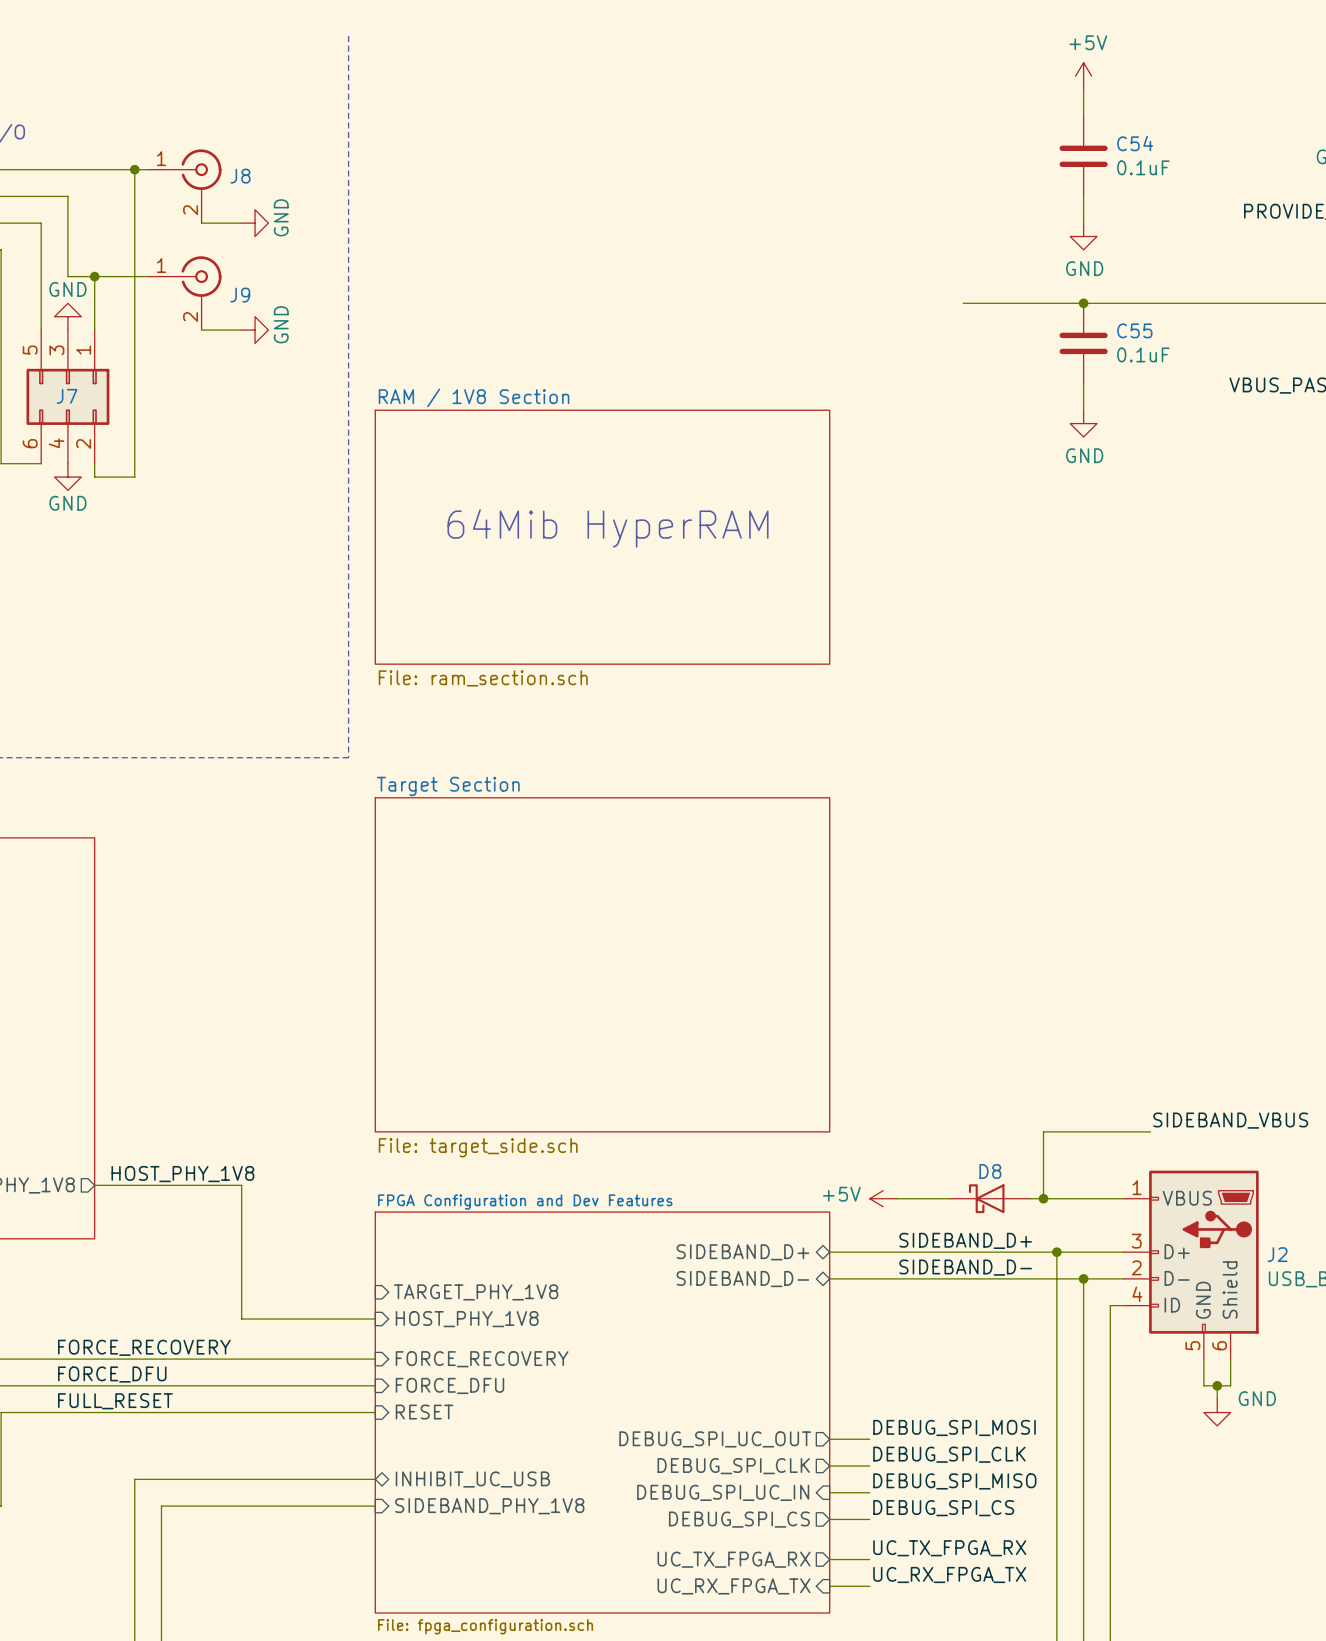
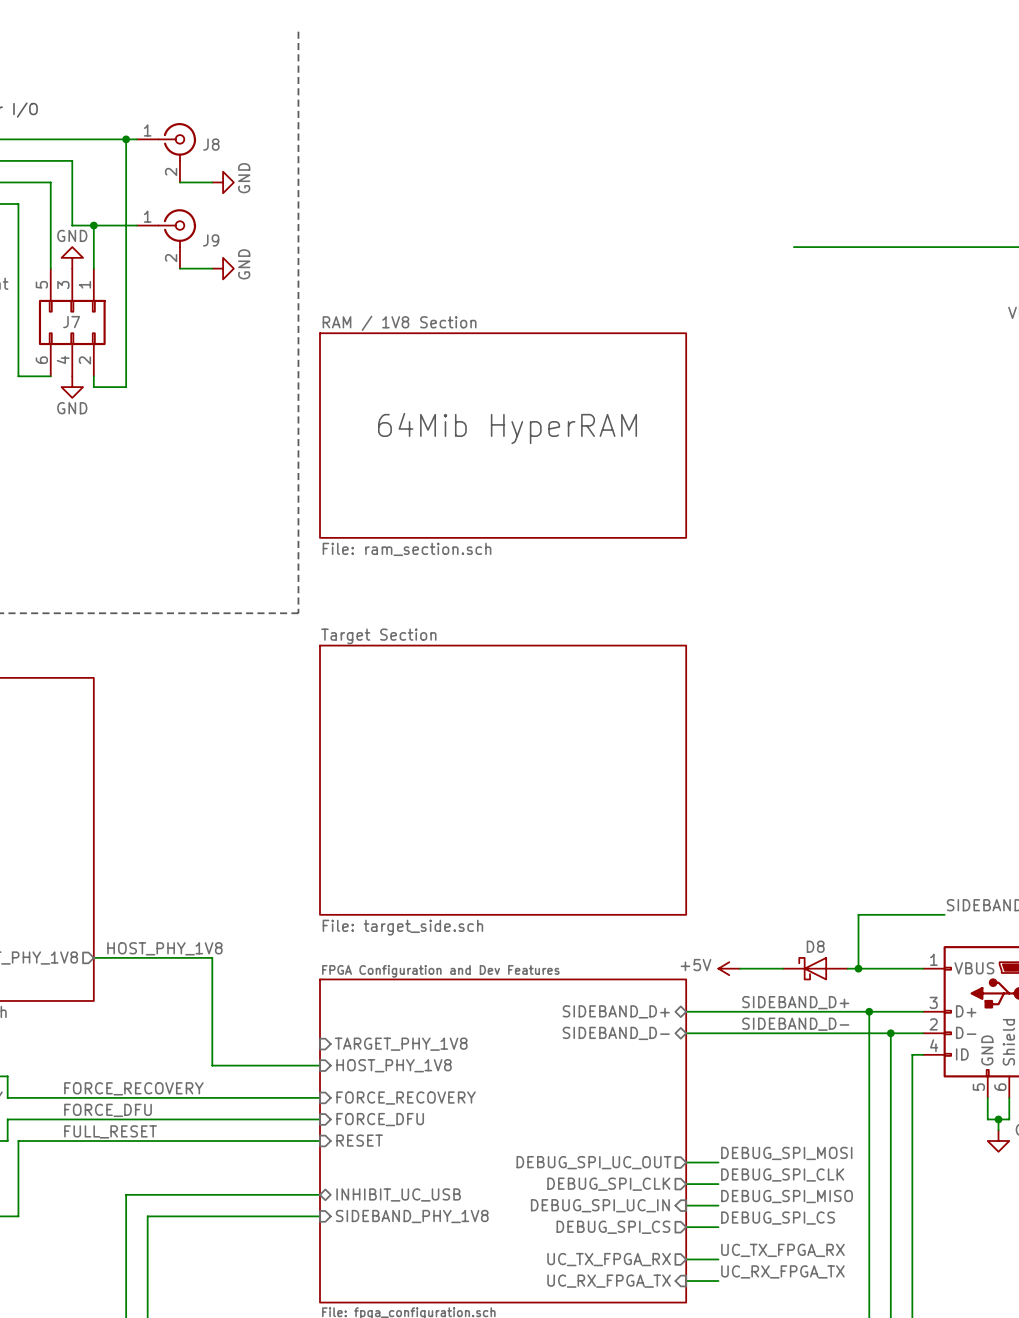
power symbol: +5V (1083, 76) -> none
wire: (1083, 89) (1083, 116) -> none
C54: 0.1uF (1083, 156) -> none
wire: (1083, 196) (1083, 223) -> none
power symbol: GND (1083, 236) -> none
junction: (1083, 303) -> none
C55: 0.1uF (1083, 343) -> none
wire: (1083, 383) (1083, 410) -> none
power symbol: GND (1083, 423) -> none

